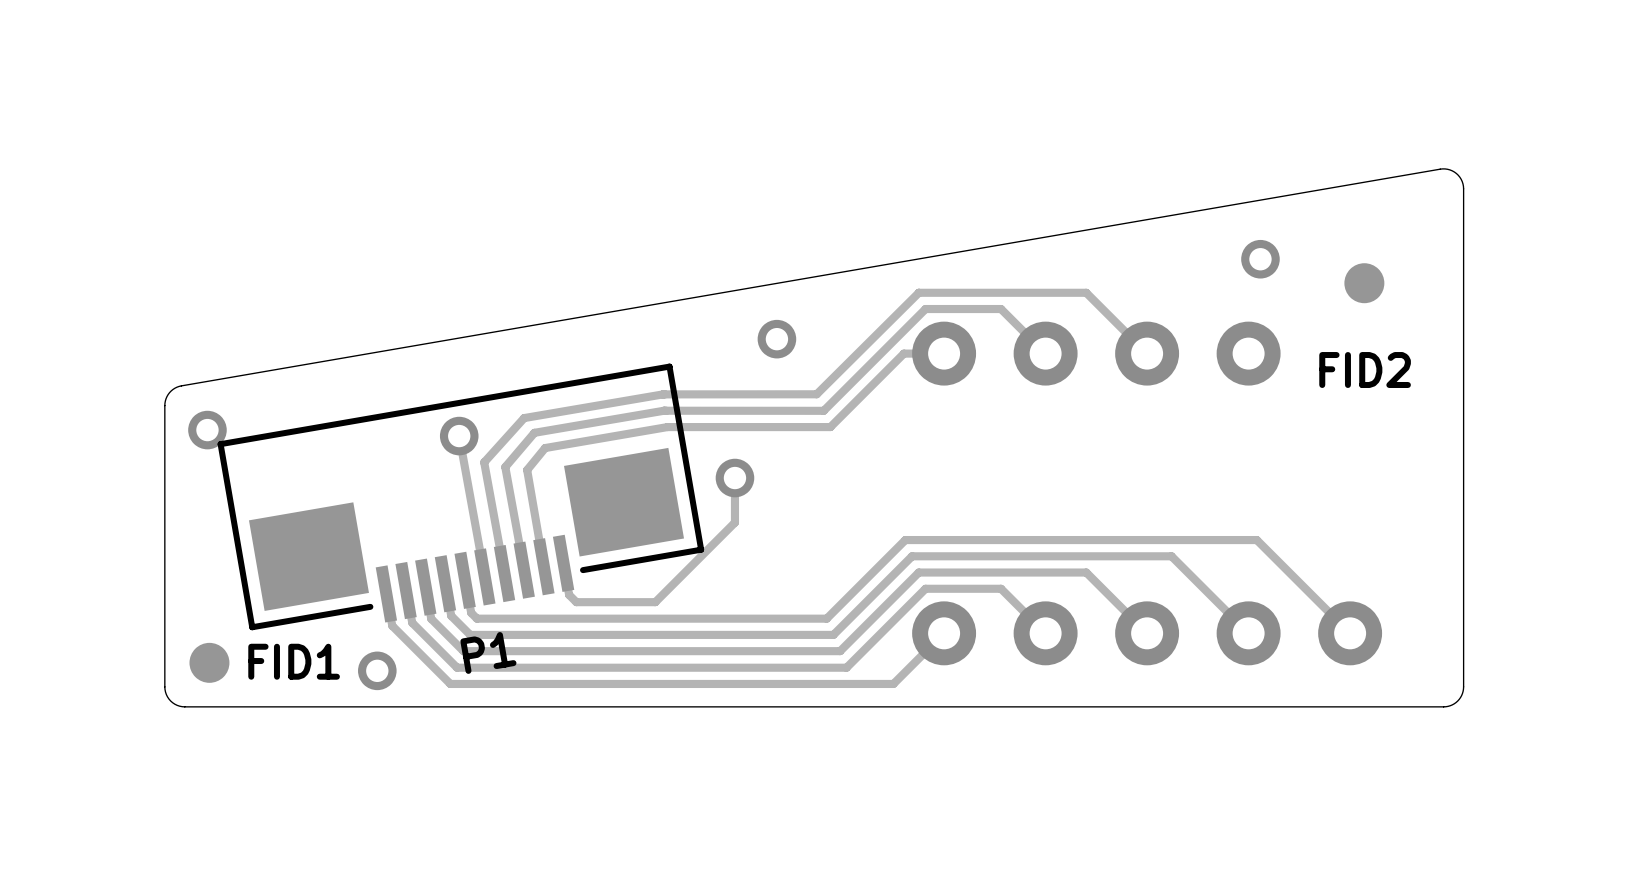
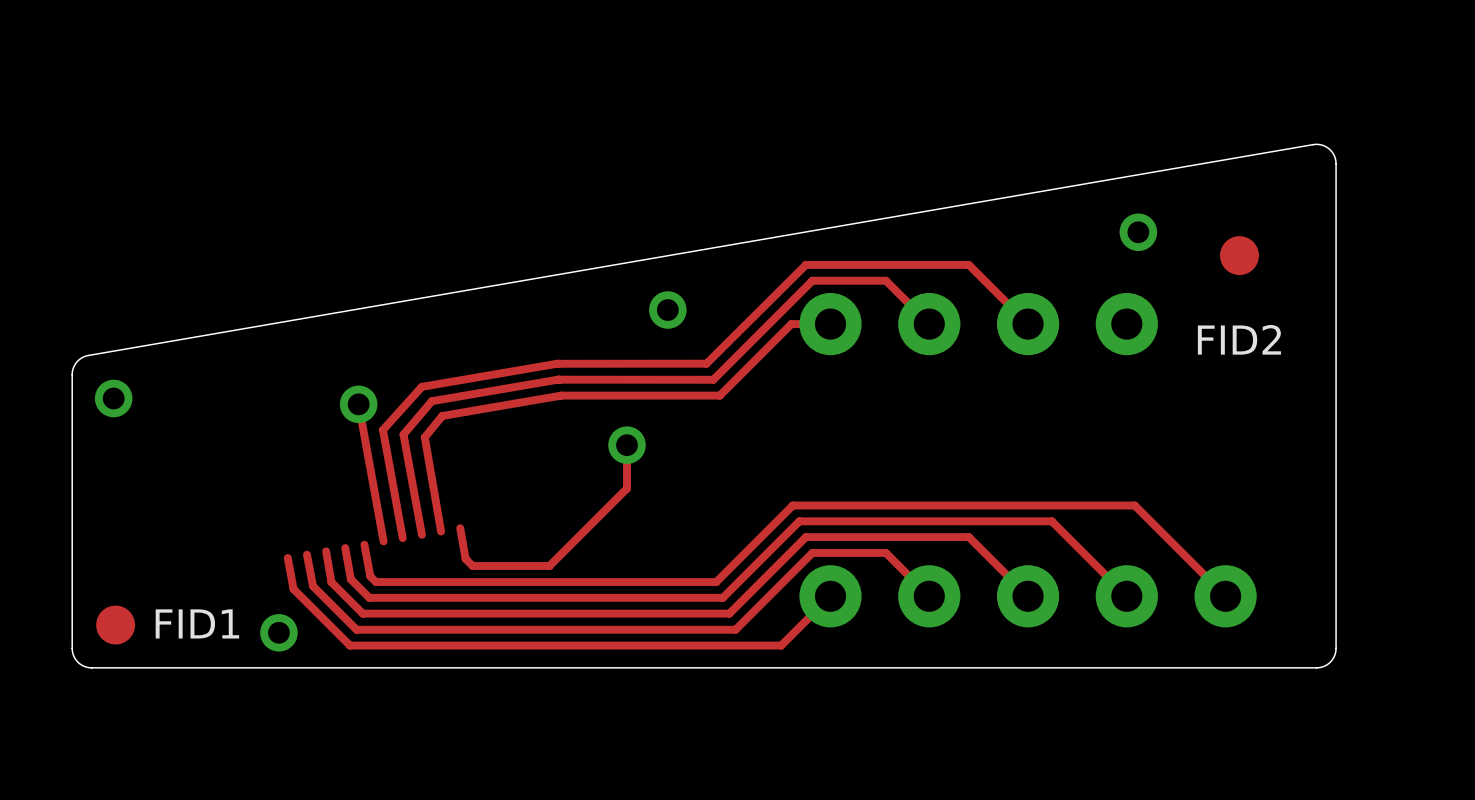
P1: (460, 496) -> none

